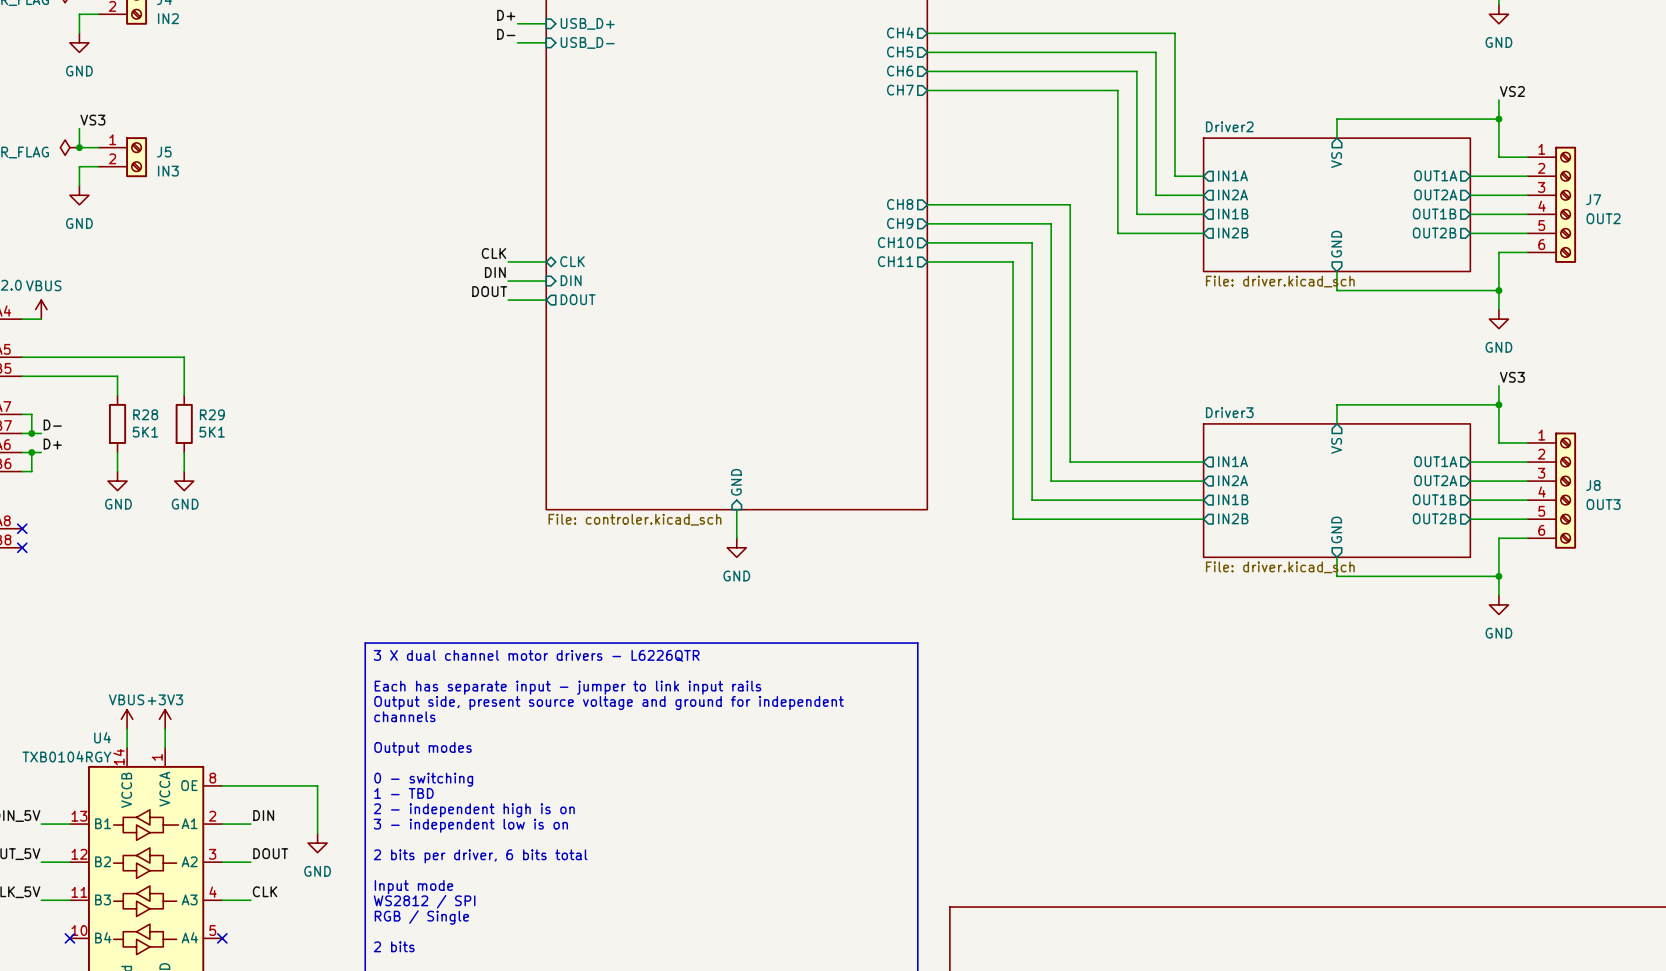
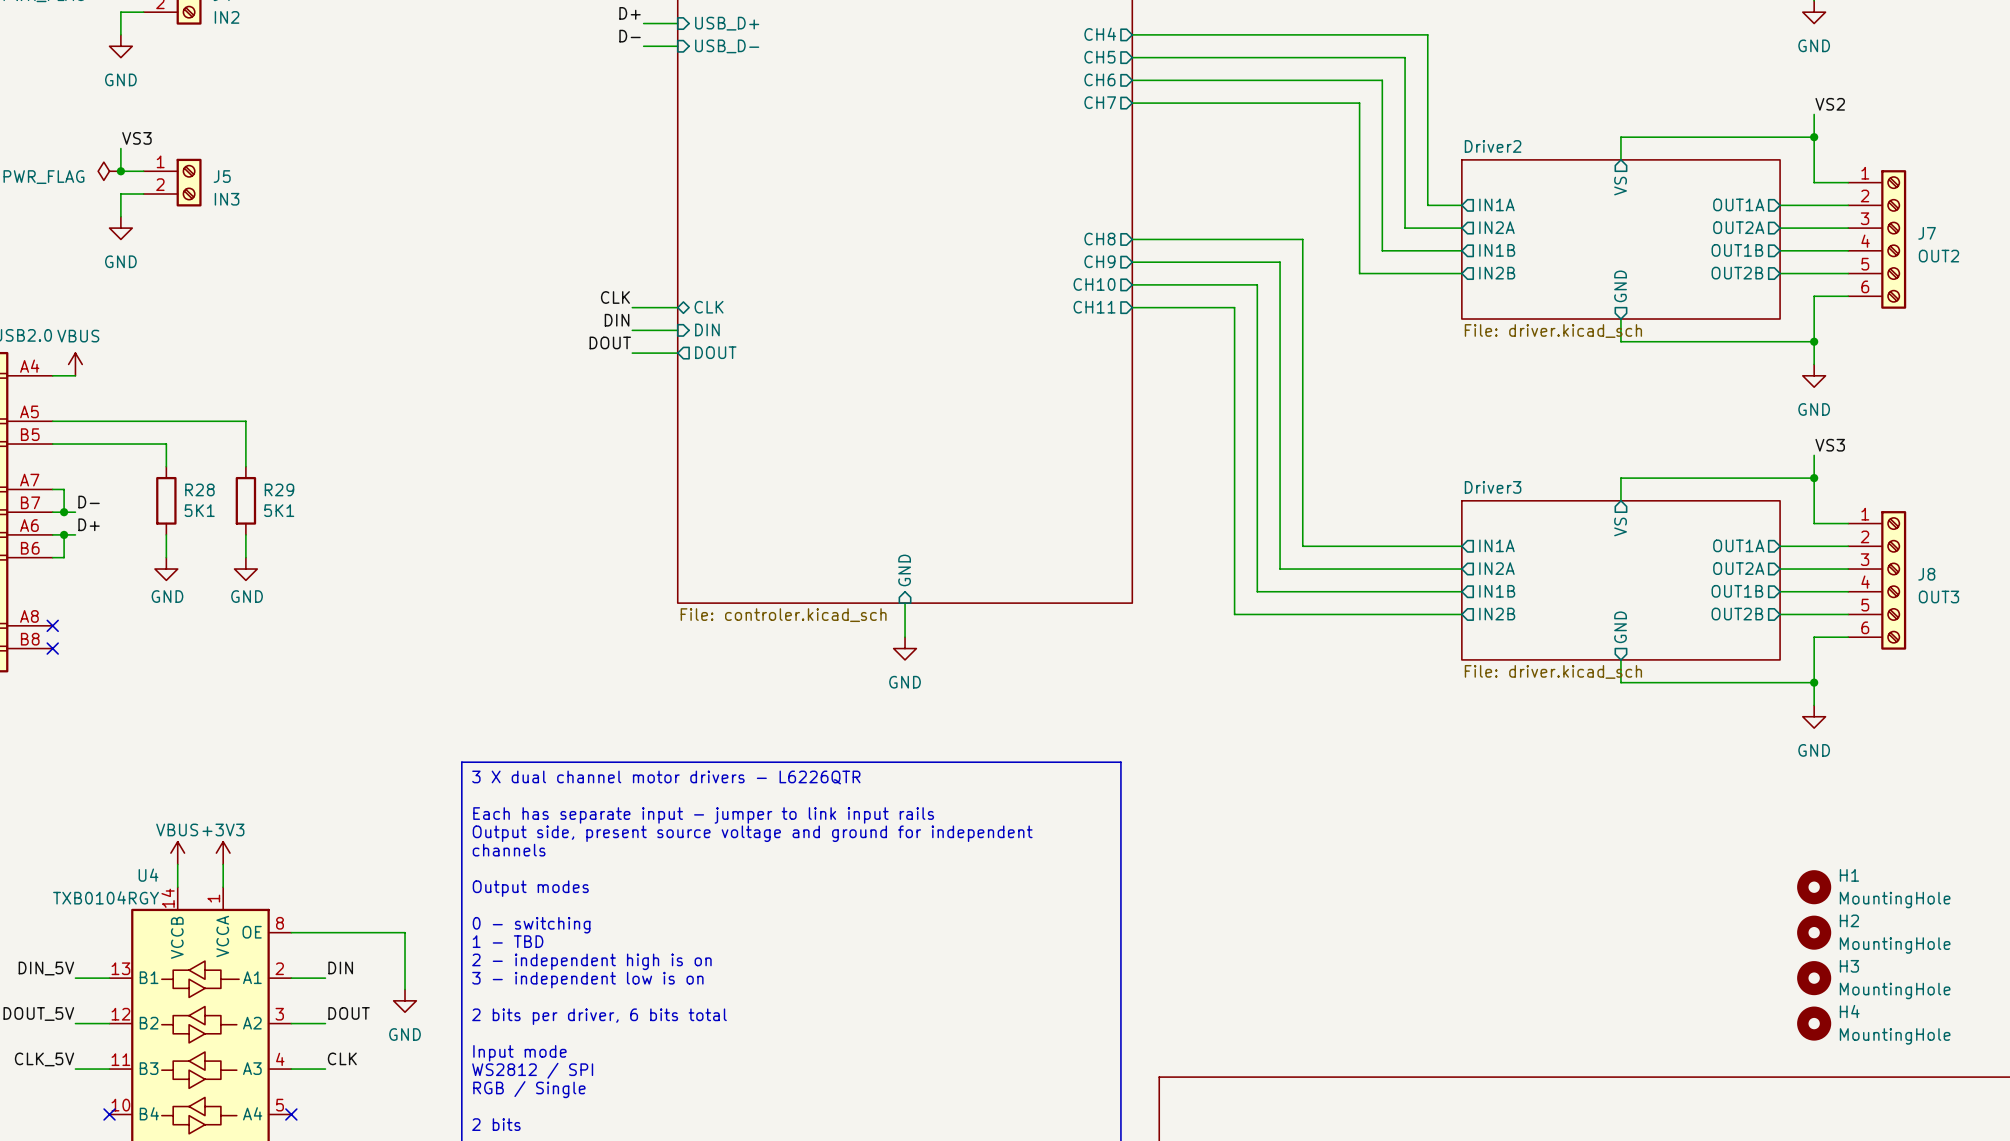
H1: none -> MountingHole (1814, 887)
H2: none -> MountingHole (1814, 932)
H3: none -> MountingHole (1814, 978)
H4: none -> MountingHole (1814, 1023)

